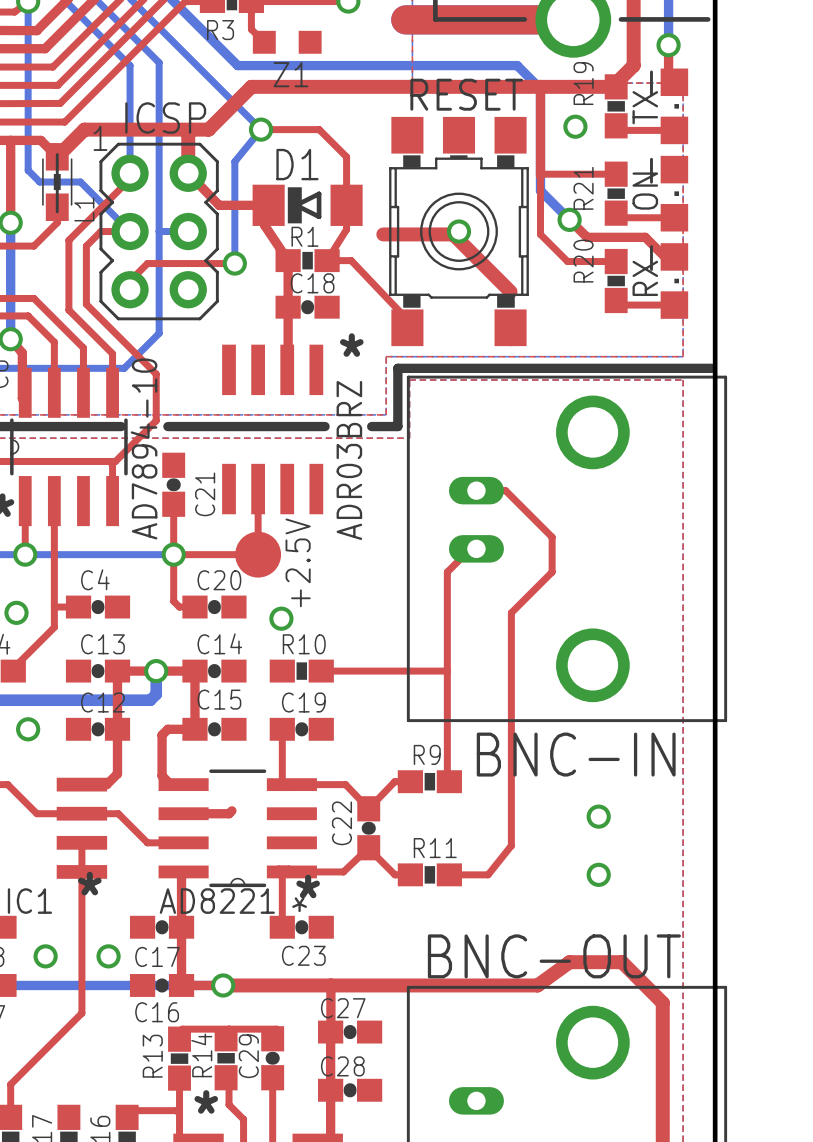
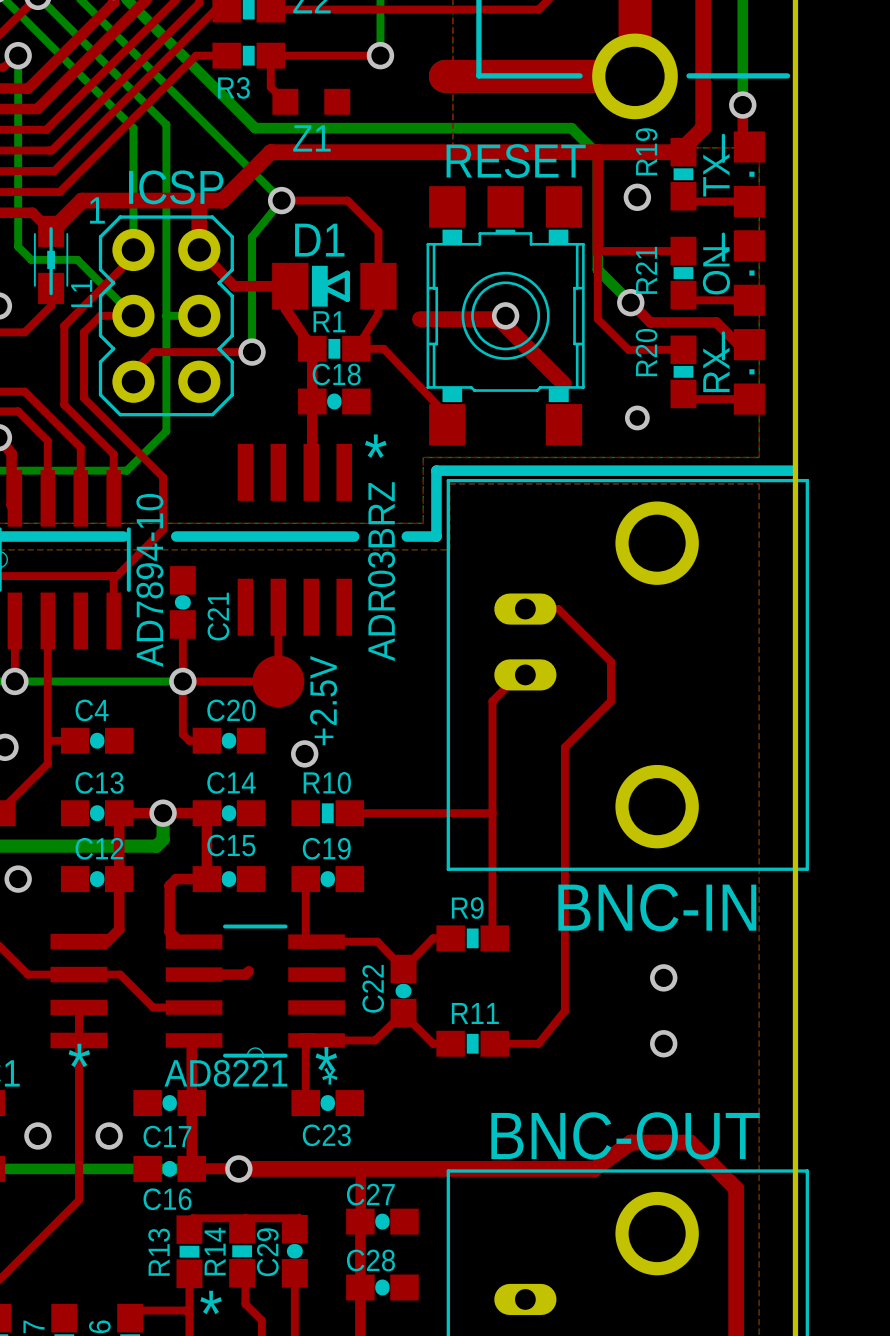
via: none -> (637, 417)

